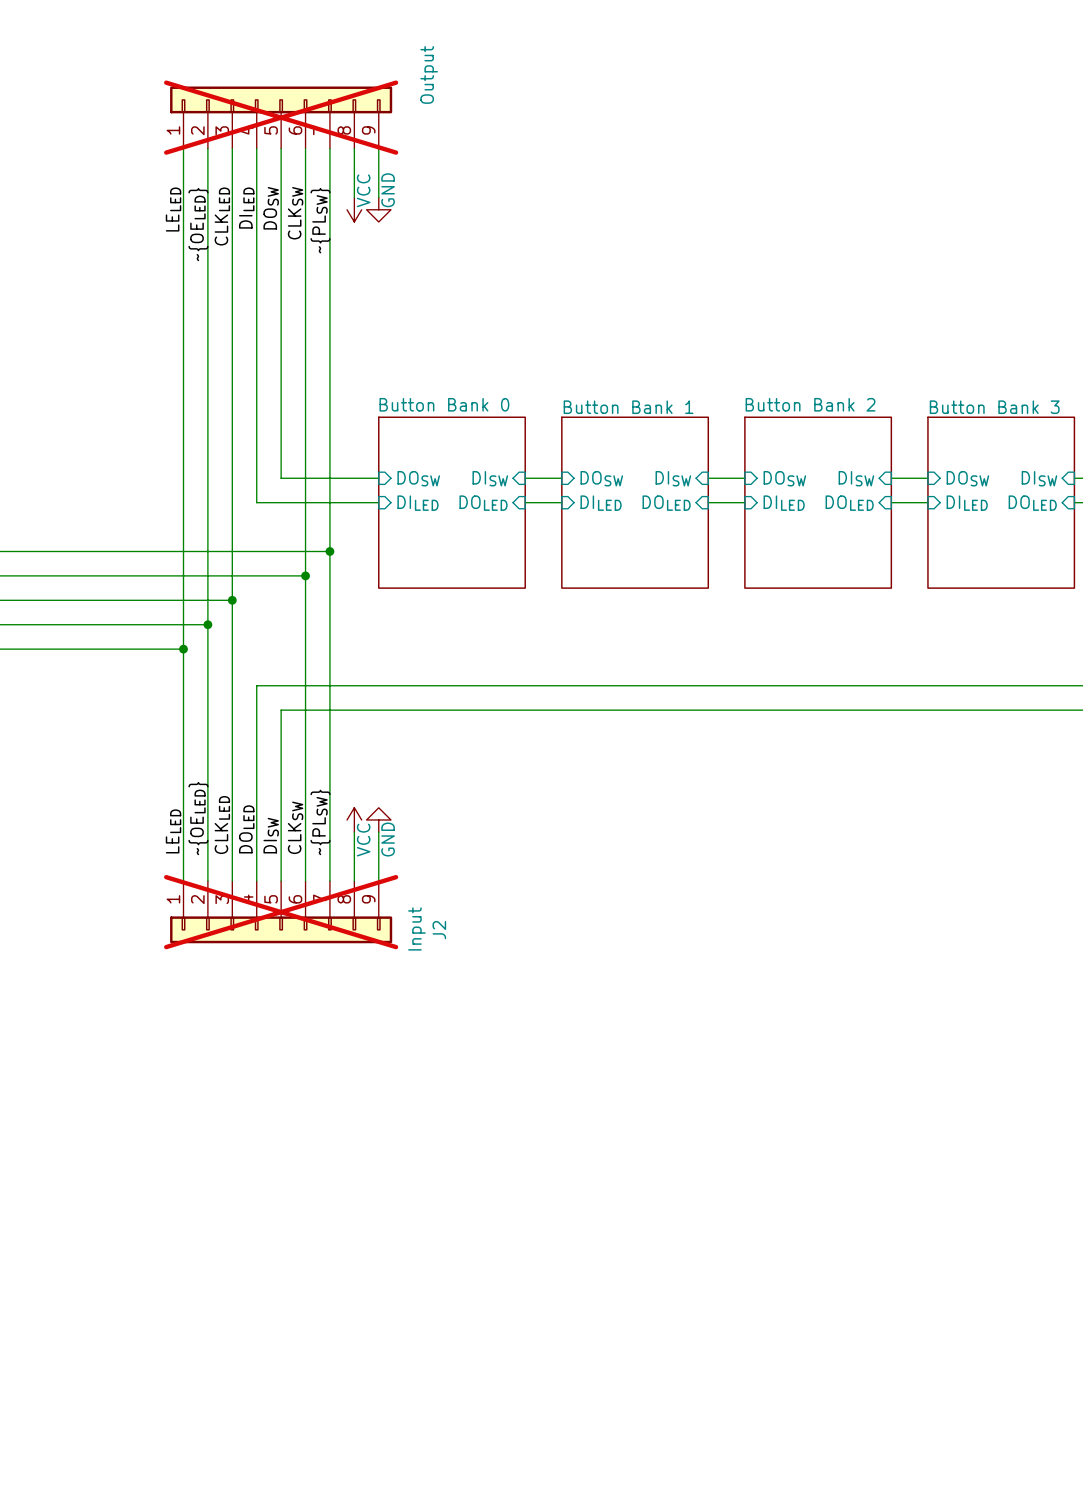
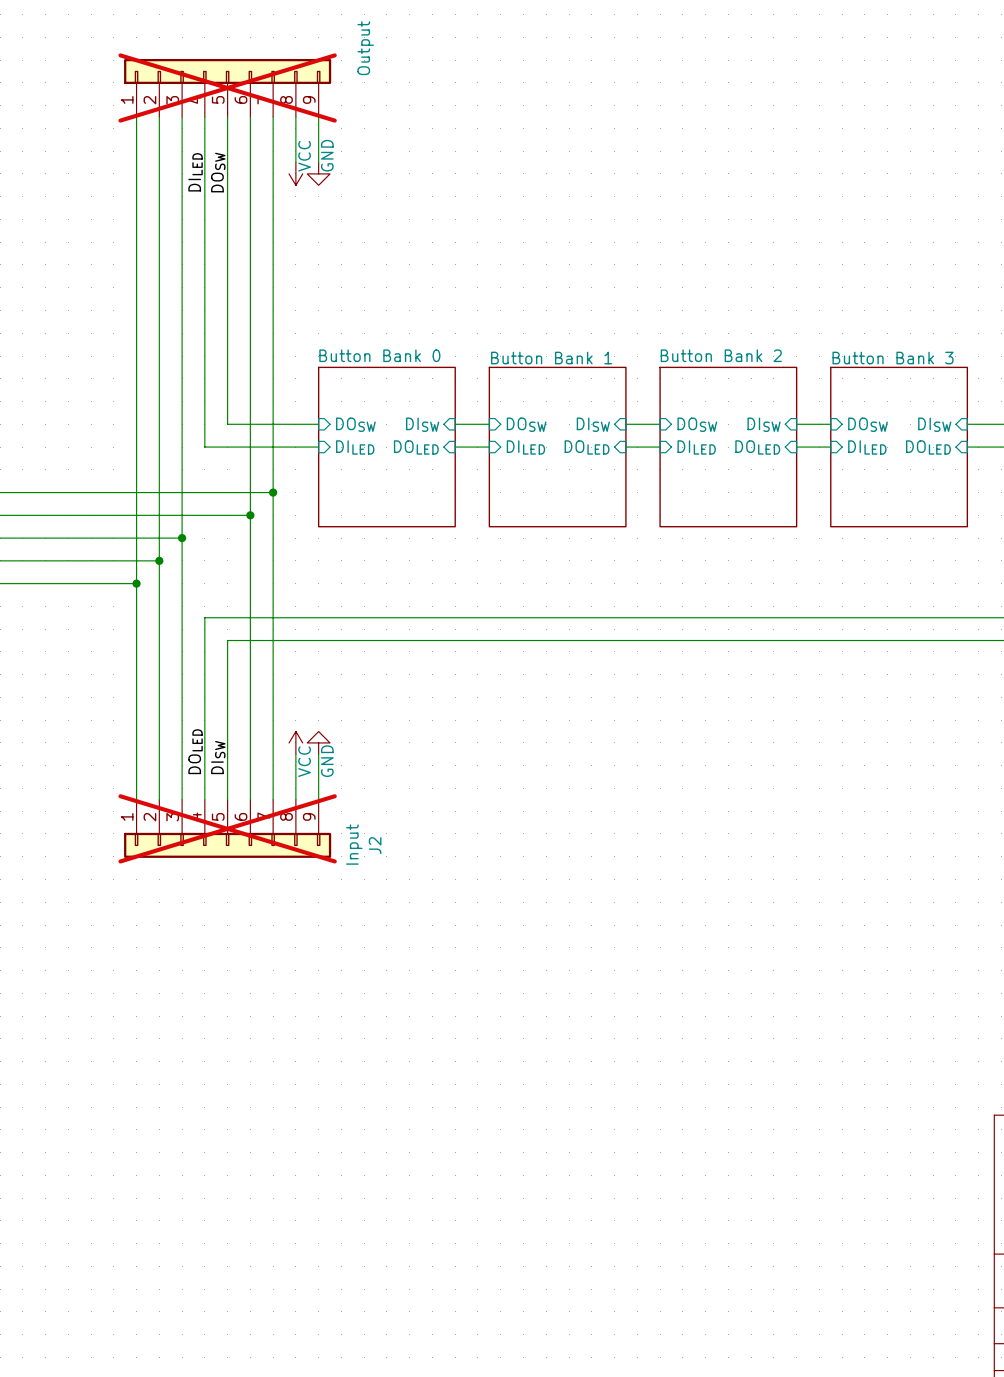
label: LELED (173, 209) -> none
label: CLKSW (295, 213) -> none
label: CLKLED (222, 216) -> none
label: ~{PLSW} (320, 220) -> none
label: ~{OELED} (198, 224) -> none
label: ~{OELED} (198, 818) -> none
label: ~{PLSW} (320, 822) -> none
label: CLKLED (222, 825) -> none
label: CLKSW (295, 827) -> none
label: LELED (173, 831) -> none

